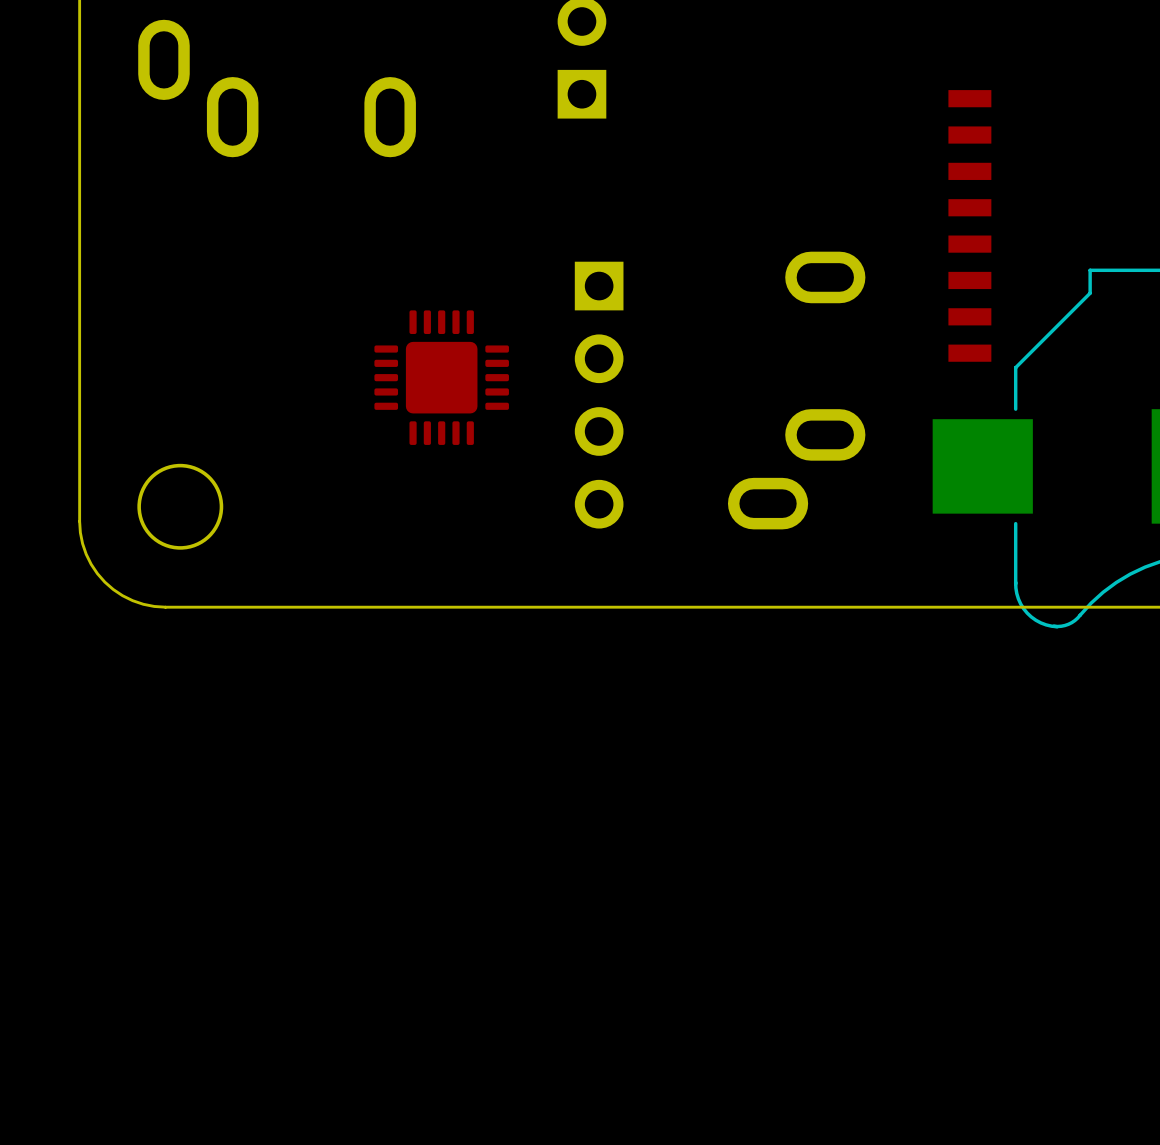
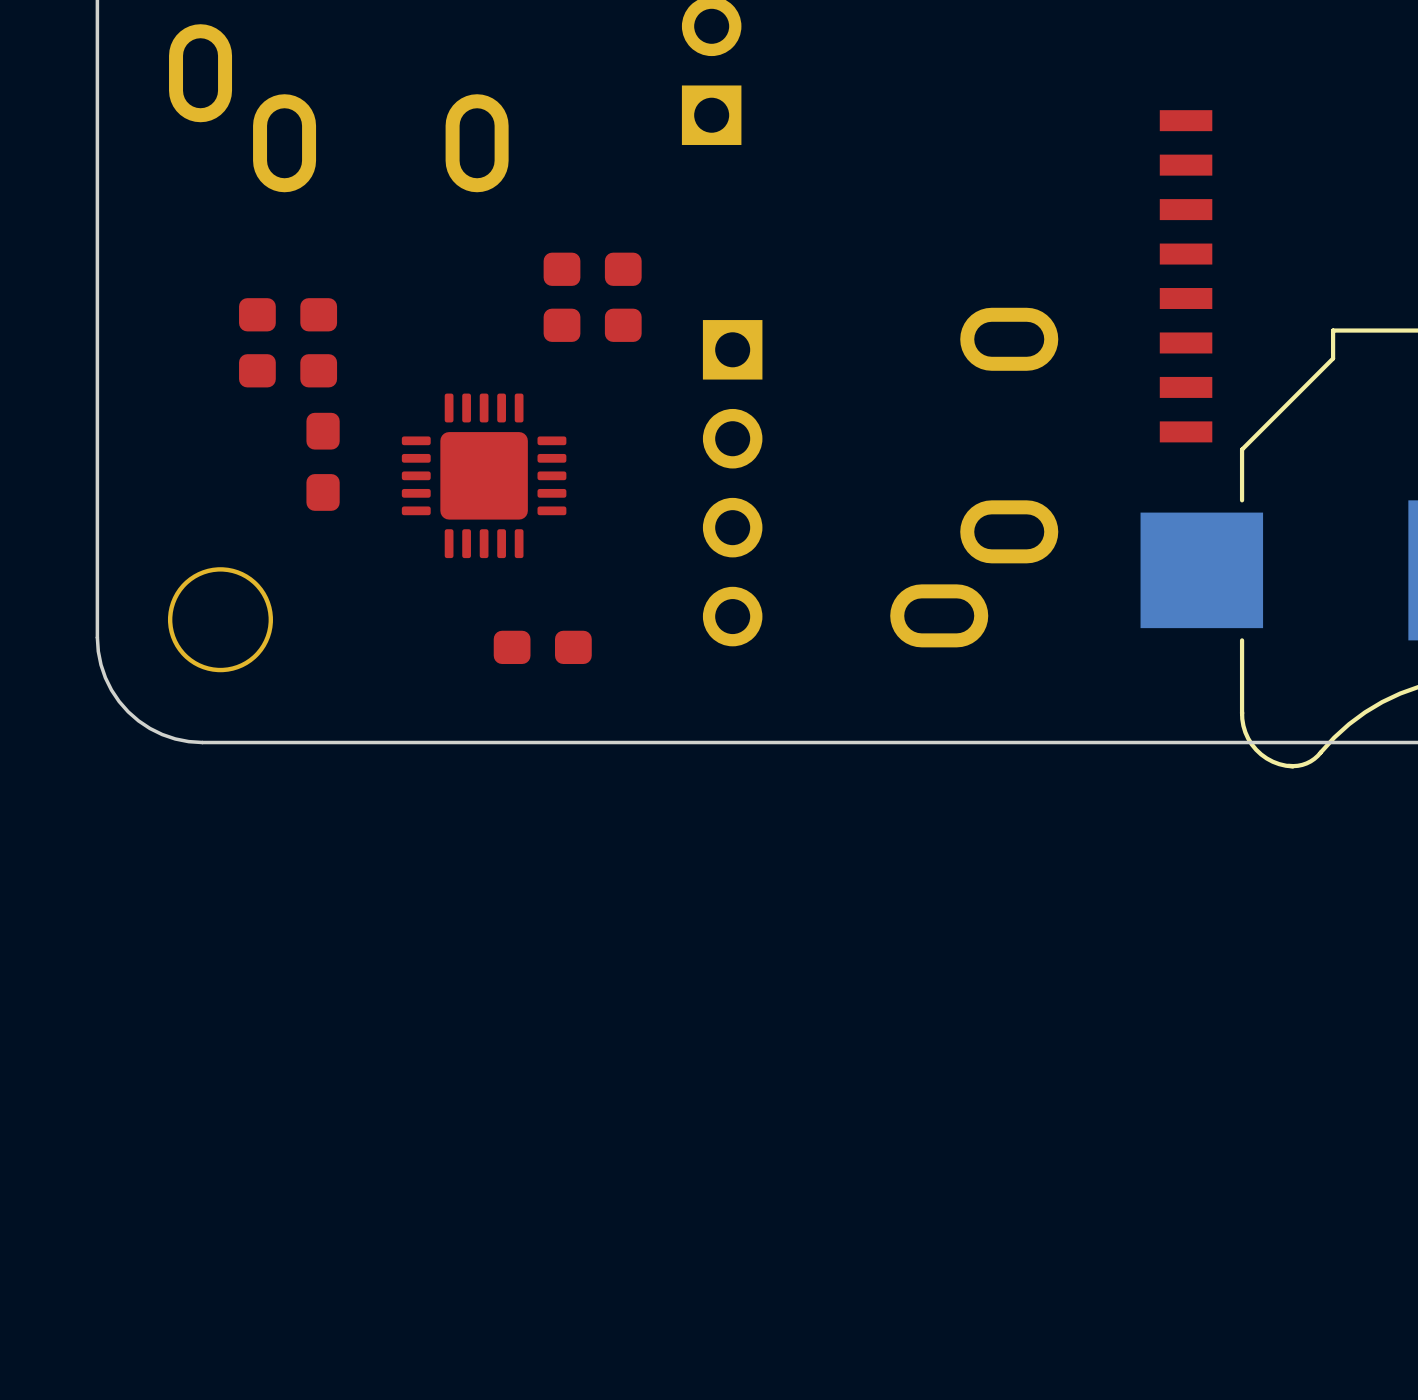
part: none -> (592, 269)
part: none -> (288, 314)
part: none -> (592, 325)
part: none -> (288, 370)
part: none -> (323, 461)
part position: (441, 377) -> (484, 475)
part: none -> (542, 647)

